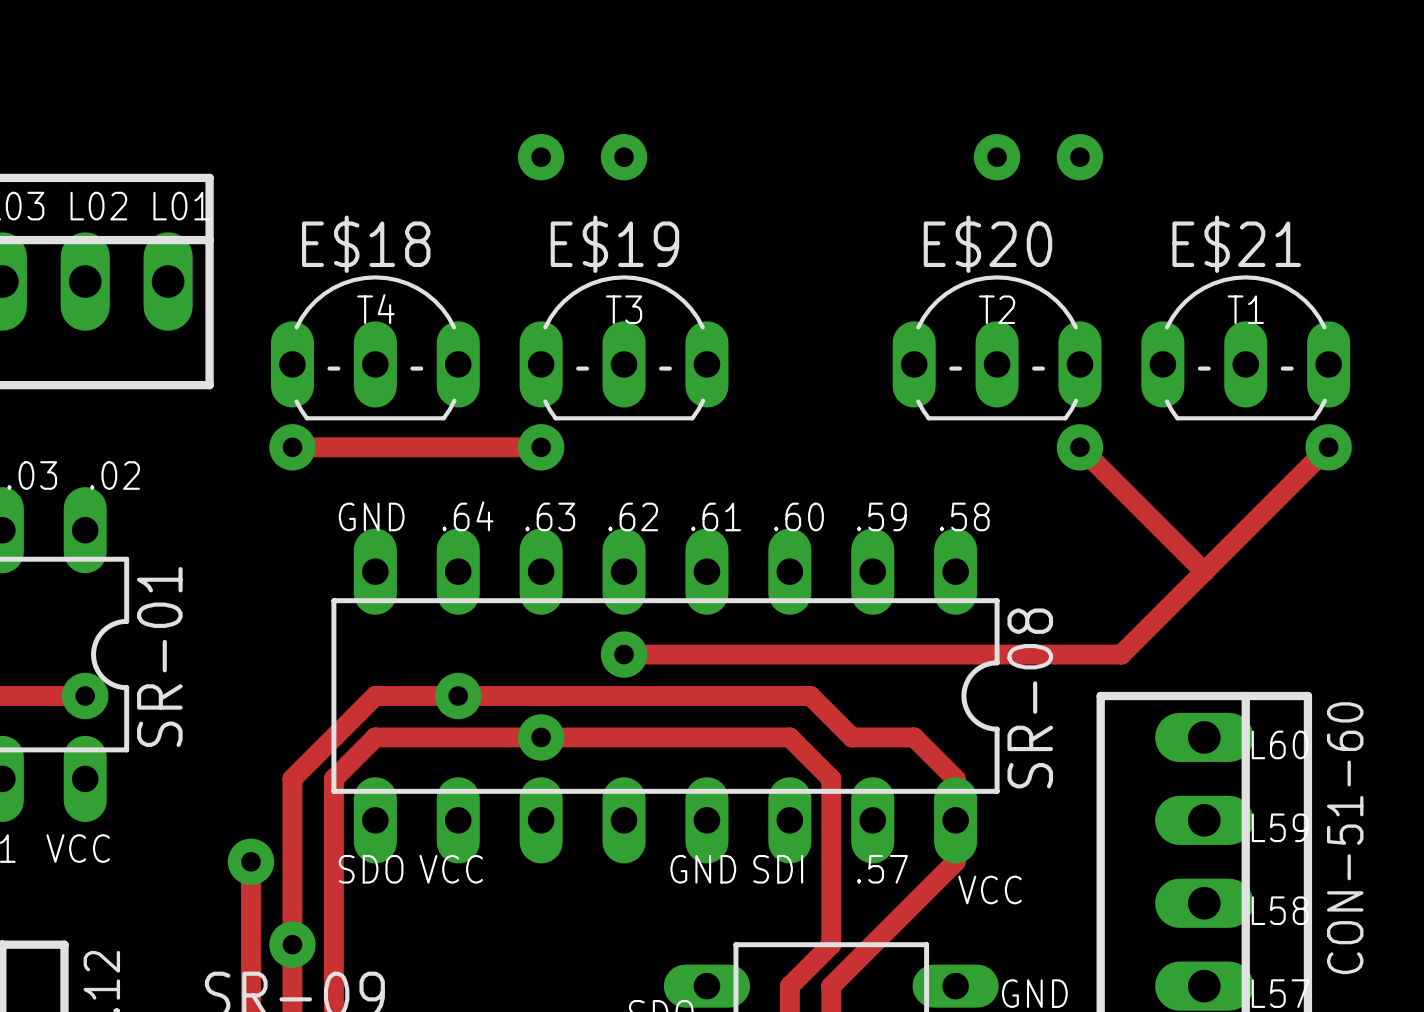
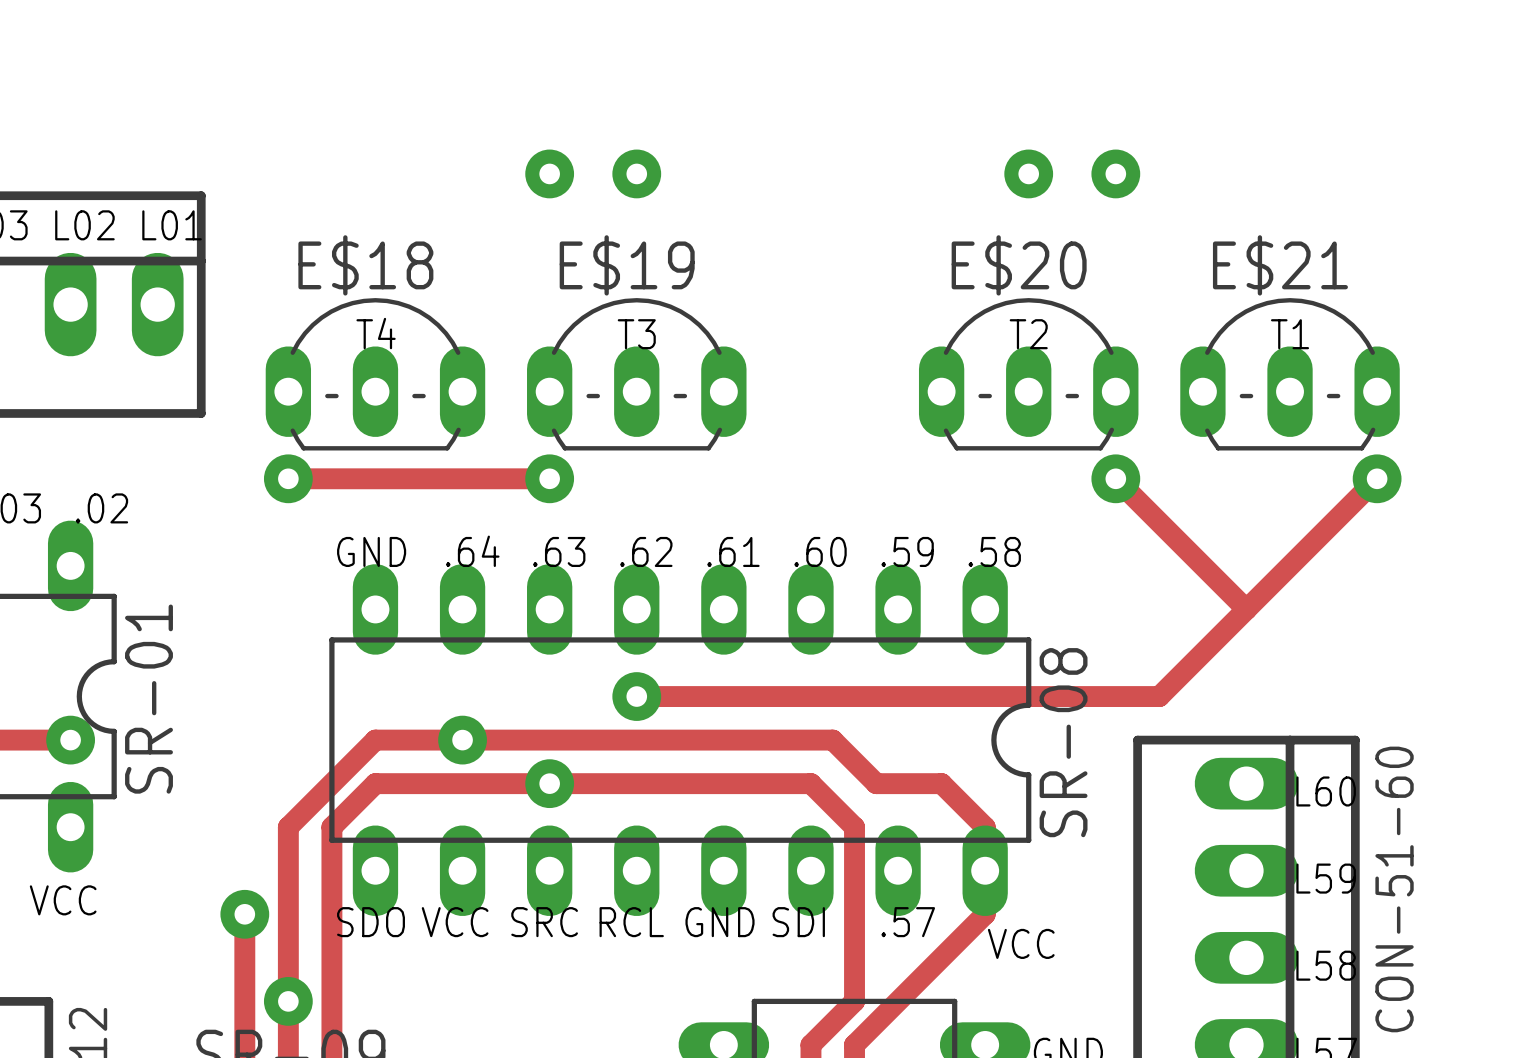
text: none -> SRC (544, 922)
text: none -> RCL (631, 922)

